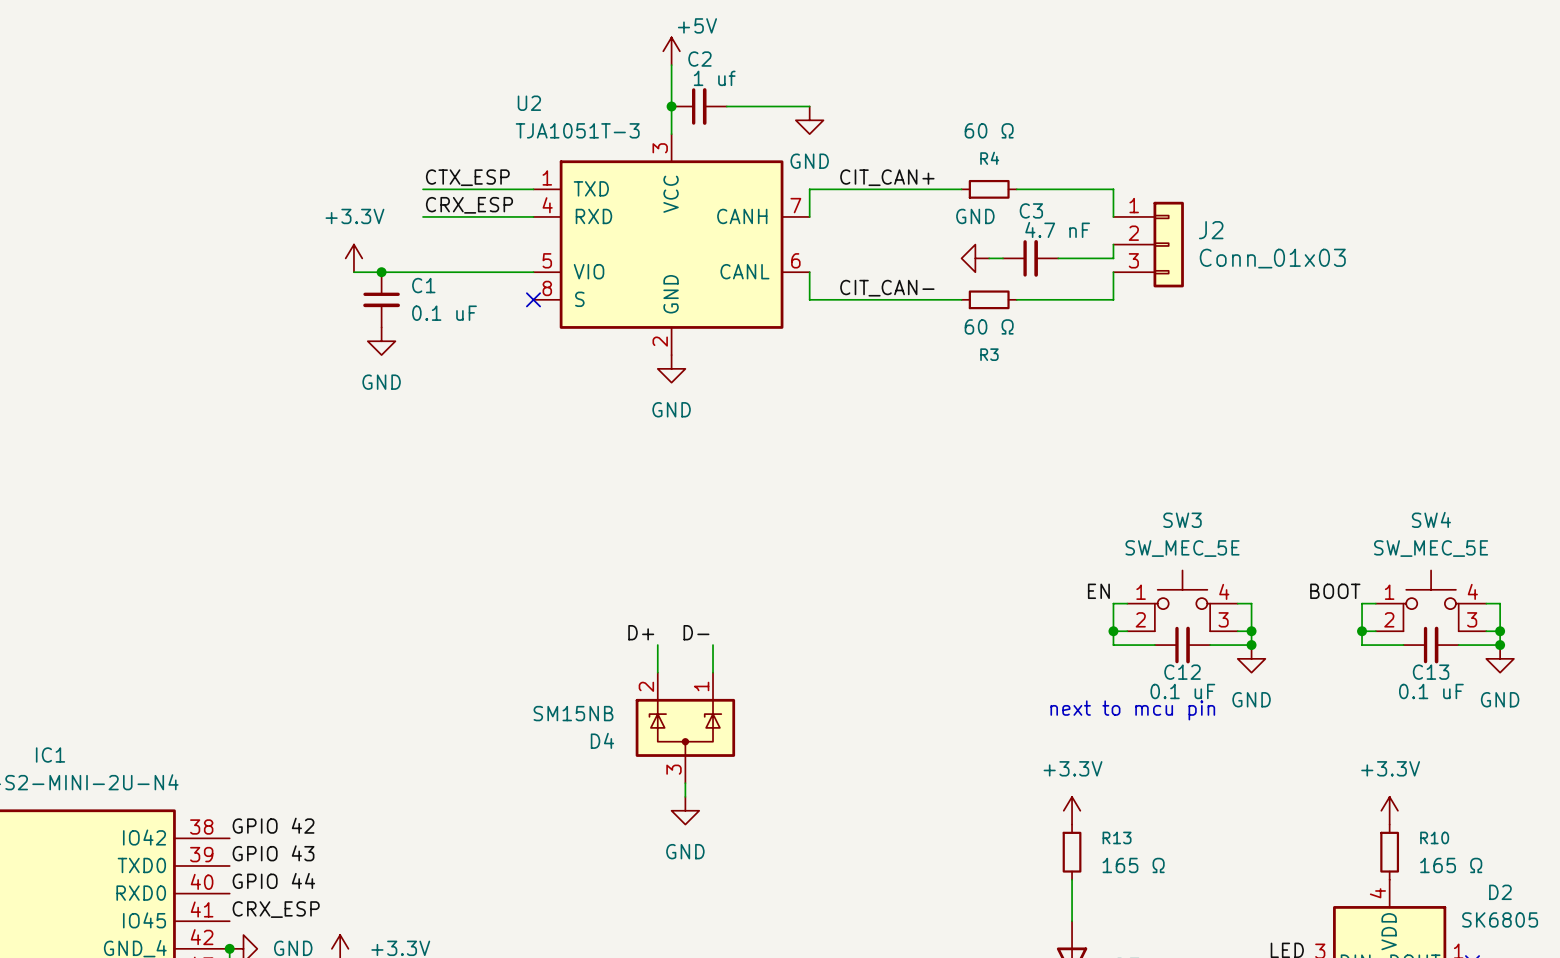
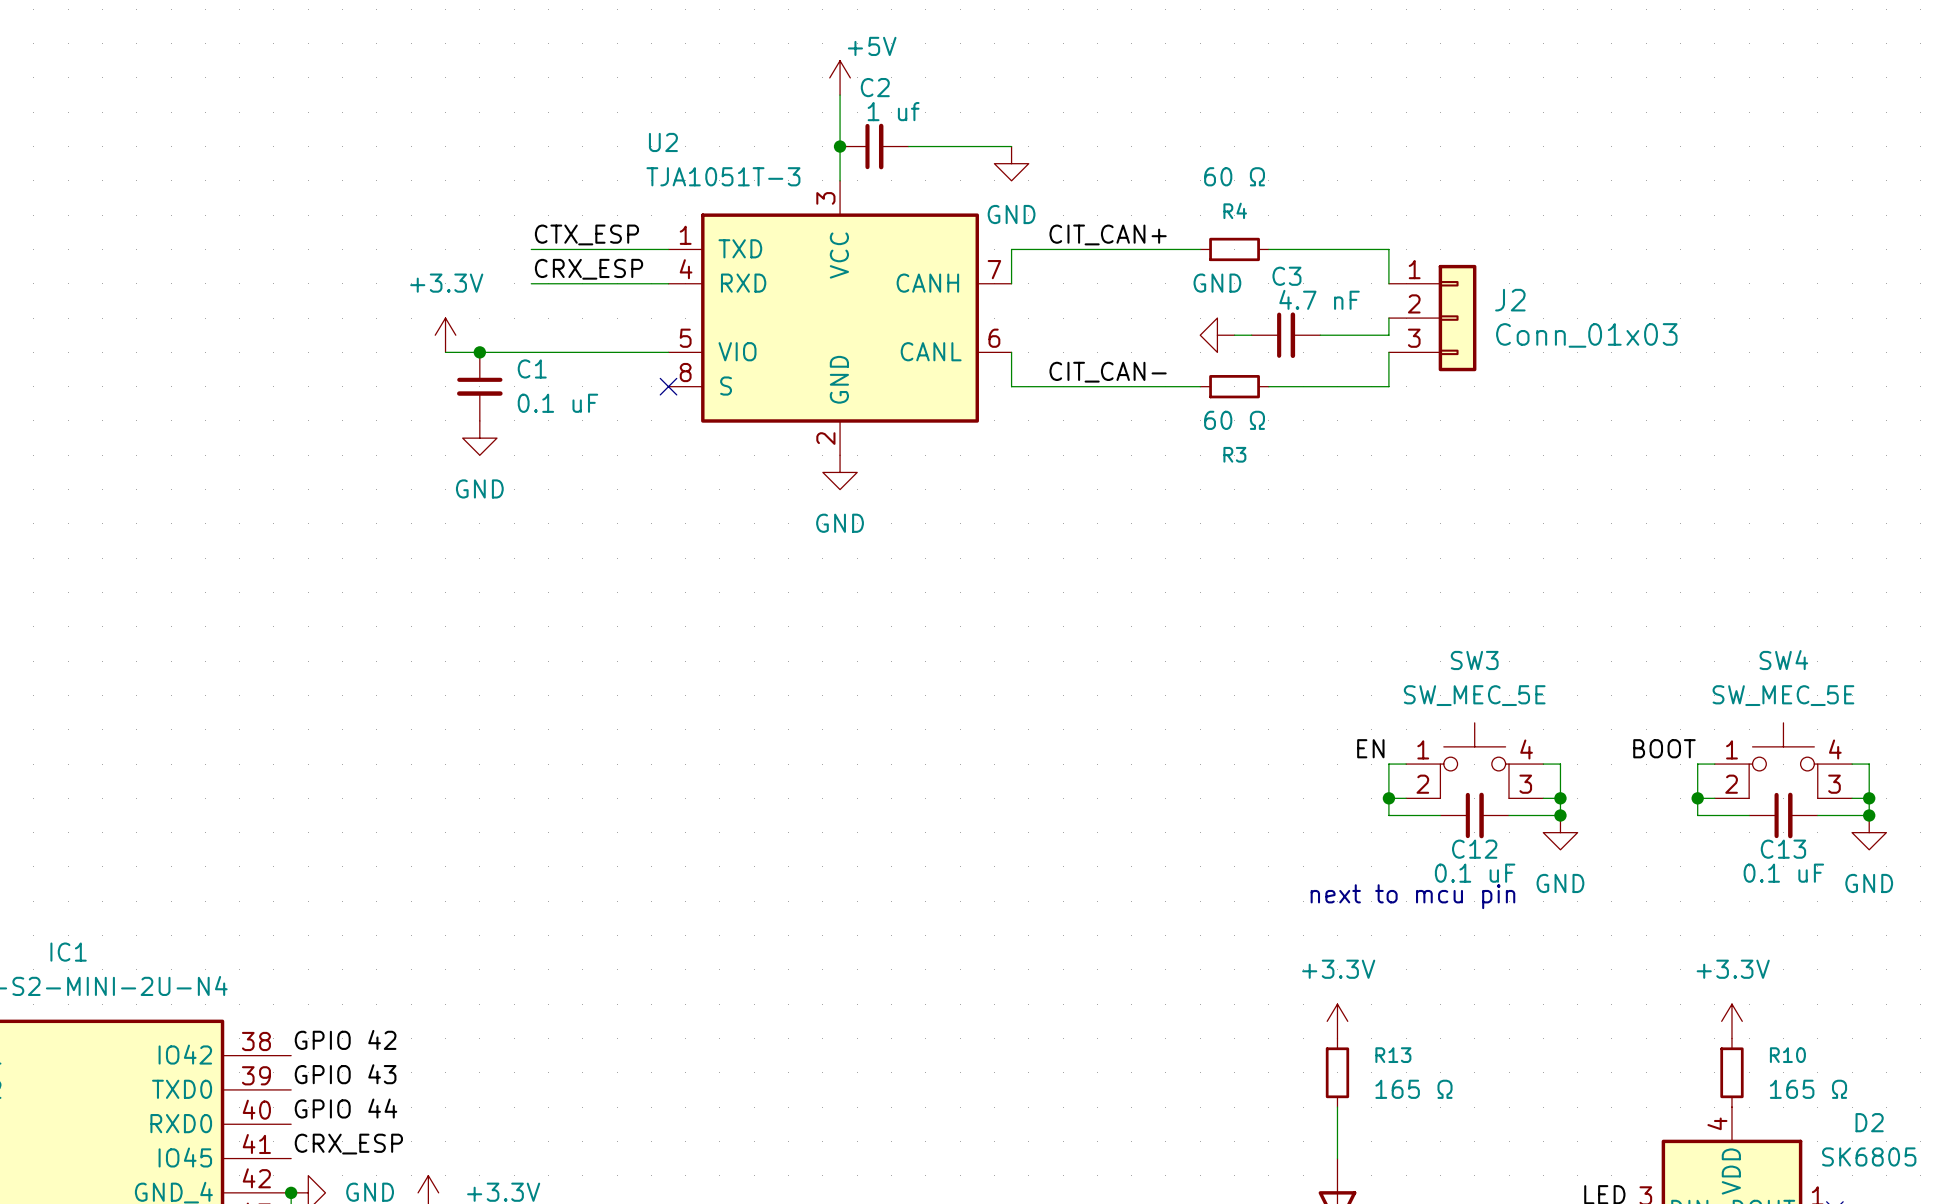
label: D+ (641, 632) -> none
label: D- (696, 632) -> none
wire: (657, 645) (657, 672) -> none
wire: (713, 645) (713, 672) -> none
D4: SM15NB (685, 727) -> none
wire: (685, 783) (685, 796) -> none
power symbol: GND (685, 810) -> none

